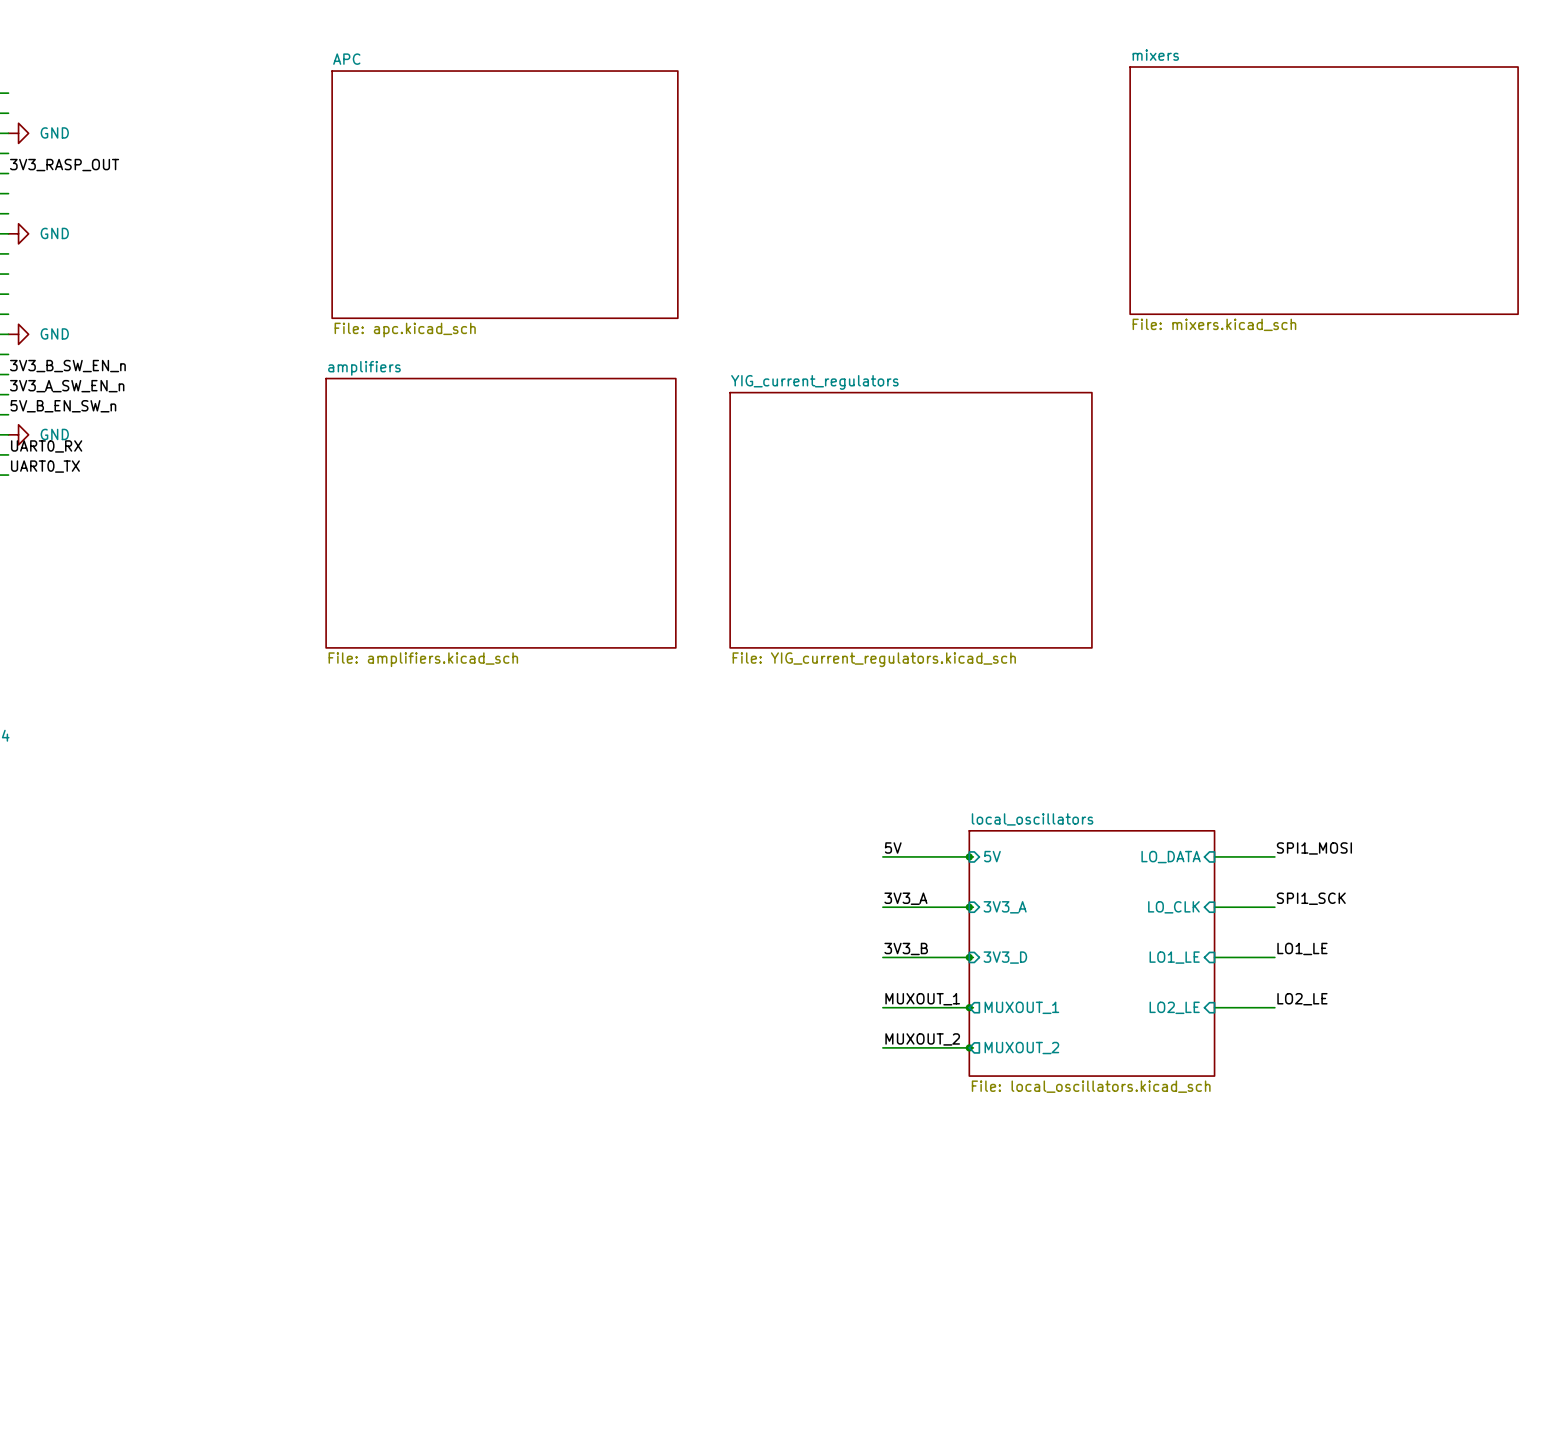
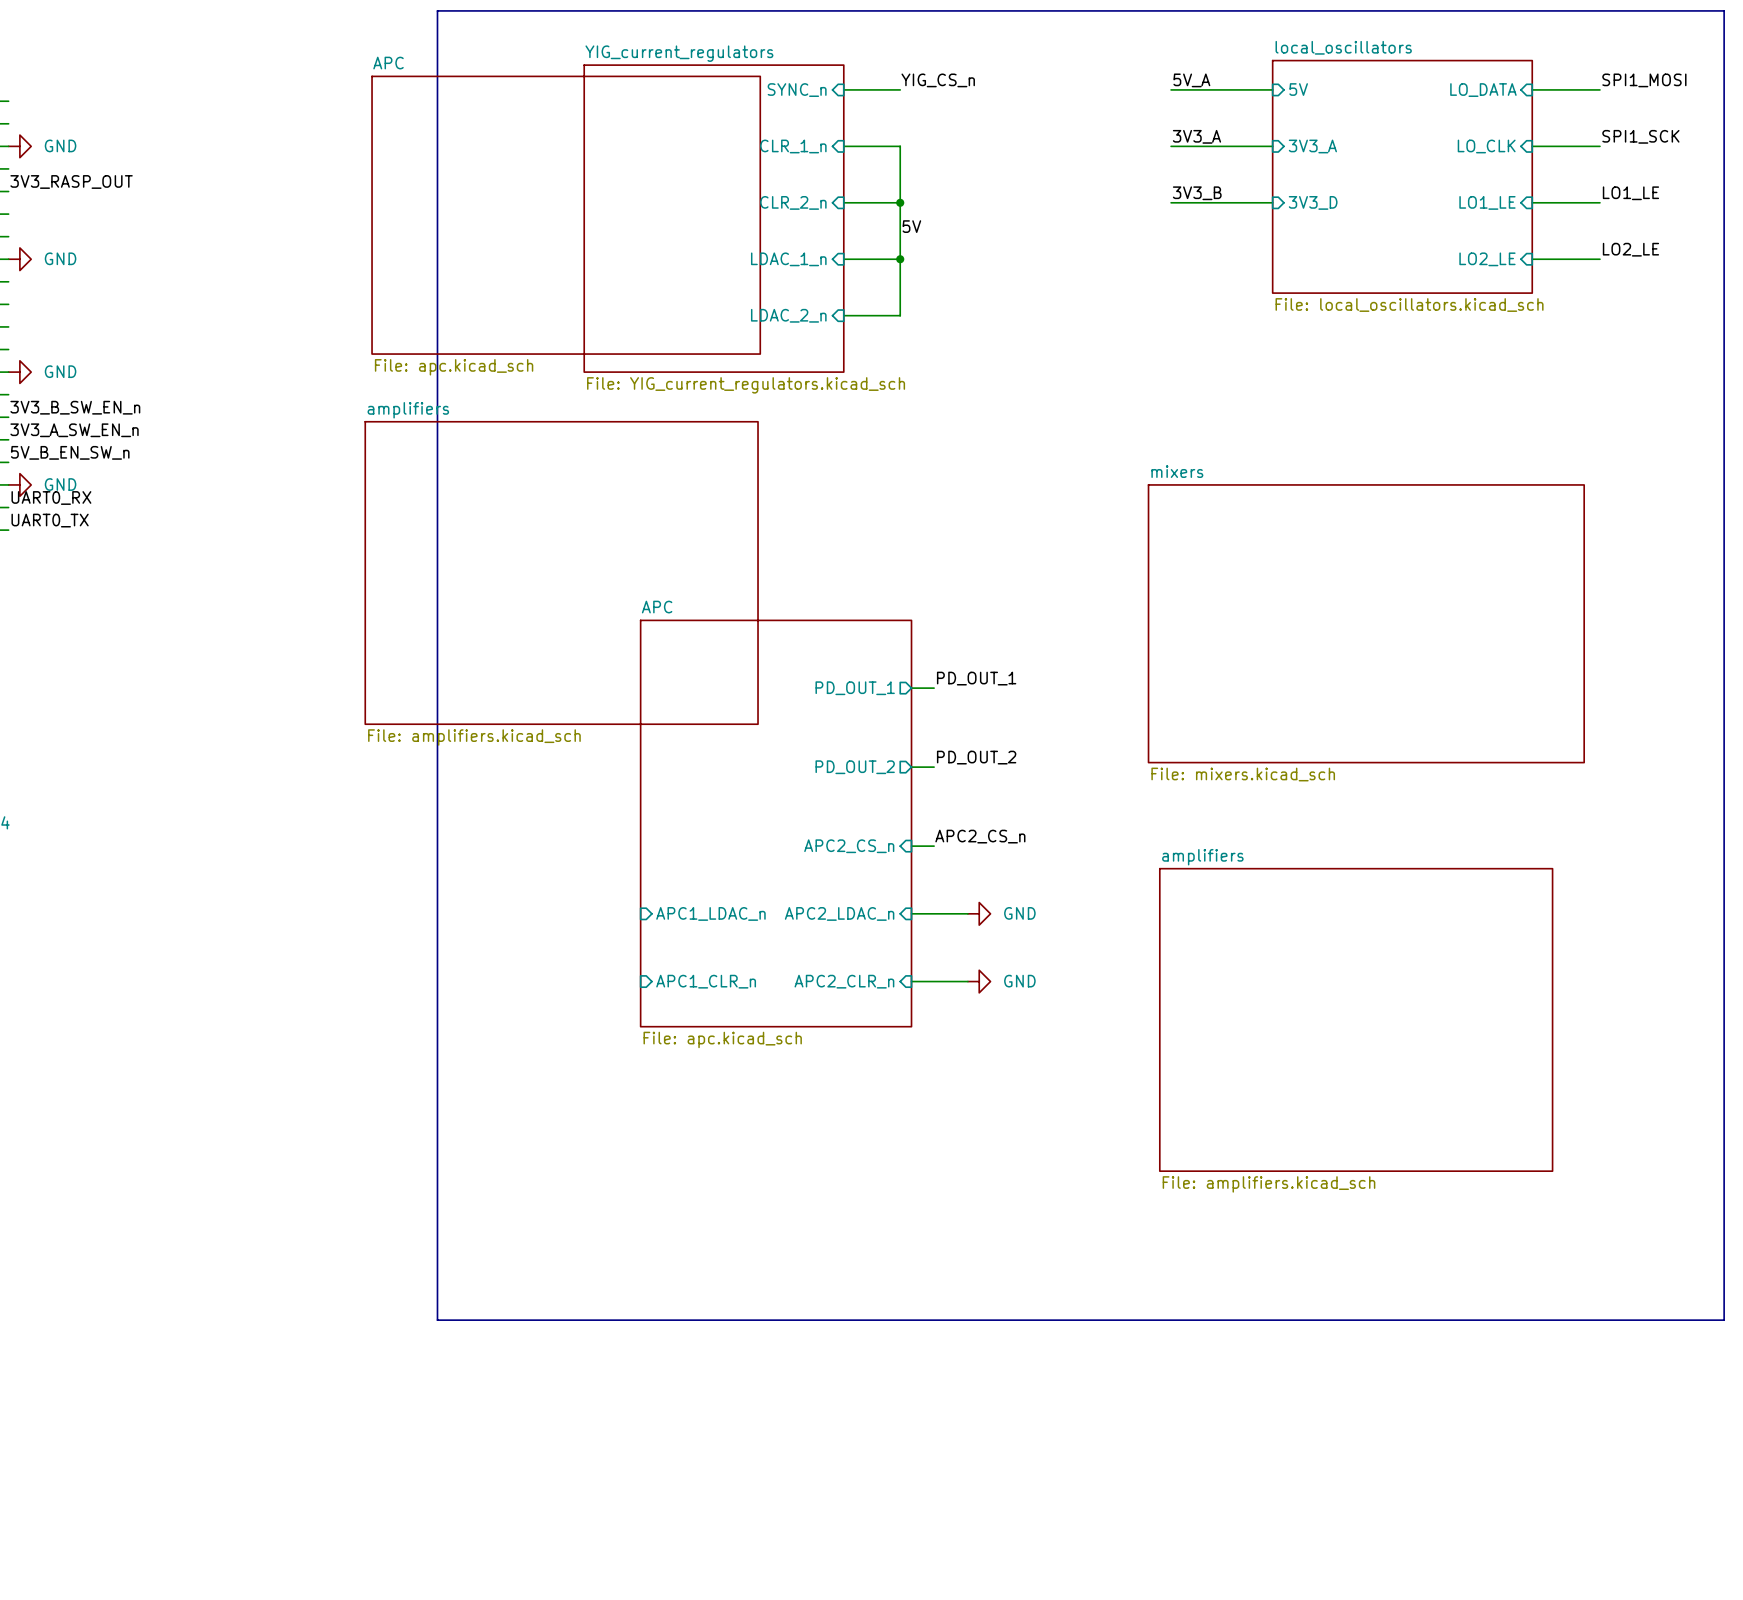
line: none -> (437, 10) (1724, 10) (1724, 1320) (437, 1320) (437, 10)
label: none -> YIG_CS_n (938, 80)
label: none -> 5V_A (1191, 80)
label: none -> SPI1_MOSI (1644, 80)
sheet pin: none -> 5V (1298, 89)
sheet pin: none -> SYNC_n (797, 90)
wire: none -> (843, 89) (900, 89)
wire: none -> (1171, 89) (1272, 89)
sheet pin: none -> LO_DATA (1483, 90)
wire: none -> (1532, 89) (1599, 89)
label: none -> 3V3_A (1196, 136)
label: none -> SPI1_SCK (1640, 136)
sheet pin: none -> CLR_1_n (793, 146)
wire: none -> (843, 146) (900, 146) (900, 315) (843, 315)
wire: none -> (1171, 146) (1272, 146)
sheet pin: none -> 3V3_A (1312, 146)
sheet pin: none -> LO_CLK (1486, 146)
wire: none -> (1532, 146) (1599, 146)
sheet local_oscillators: none -> File: local_oscillators.kicad_sch (1402, 176)
label: none -> 3V3_B (1197, 193)
label: none -> LO1_LE (1630, 193)
sheet pin: none -> CLR_2_n (793, 202)
wire: none -> (843, 202) (900, 202)
junction: none -> (900, 202)
wire: none -> (1171, 202) (1272, 202)
sheet pin: none -> 3V3_D (1313, 202)
sheet pin: none -> LO1_LE (1487, 202)
wire: none -> (1532, 202) (1599, 202)
sheet mixers: File: mixers.kicad_sch (1324, 190) -> none
sheet YIG_current_regulators: none -> File: YIG_current_regulators.kicad_sch (714, 218)
label: none -> 5V (911, 226)
label: none -> LO2_LE (1630, 249)
sheet pin: none -> LDAC_1_n (788, 259)
wire: none -> (843, 259) (900, 259)
junction: none -> (900, 259)
sheet pin: none -> LO2_LE (1487, 259)
wire: none -> (1532, 259) (1599, 259)
sheet pin: none -> LDAC_2_n (788, 315)
sheet YIG_current_regulators: File: YIG_current_regulators.kicad_sch (911, 520) -> none
sheet mixers: none -> File: mixers.kicad_sch (1366, 623)
label: none -> PD_OUT_1 (976, 678)
sheet pin: none -> PD_OUT_1 (855, 688)
wire: none -> (911, 688) (934, 688)
label: none -> PD_OUT_2 (976, 757)
sheet pin: none -> PD_OUT_2 (855, 767)
wire: none -> (911, 767) (934, 767)
sheet APC: none -> File: apc.kicad_sch (776, 823)
label: none -> APC2_CS_n (980, 836)
sheet pin: none -> APC2_CS_n (849, 846)
wire: none -> (911, 846) (934, 846)
sheet pin: none -> APC1_LDAC_n (710, 913)
sheet pin: none -> APC2_LDAC_n (839, 913)
wire: none -> (911, 913) (967, 913)
power symbol: none -> GND (979, 913)
label: 5V (893, 847) -> none
label: SPI1_MOSI (1314, 848) -> none
wire: (882, 856) (973, 856) -> none
junction: (969, 856) -> none
sheet pin: 5V (992, 856) -> none
wire: (1214, 856) (1274, 856) -> none
sheet pin: LO_DATA (1171, 857) -> none
sheet pin: none -> APC1_CLR_n (706, 981)
sheet pin: none -> APC2_CLR_n (844, 981)
wire: none -> (911, 981) (967, 981)
power symbol: none -> GND (979, 981)
label: 3V3_A (905, 898) -> none
label: SPI1_SCK (1311, 898) -> none
wire: (882, 907) (973, 907) -> none
junction: (969, 907) -> none
sheet pin: 3V3_A (1005, 907) -> none
sheet pin: LO_CLK (1173, 907) -> none
wire: (1214, 907) (1274, 907) -> none
sheet amplifiers: none -> File: amplifiers.kicad_sch (1356, 1019)
label: 3V3_B (906, 948) -> none
label: LO1_LE (1302, 948) -> none
sheet local_oscillators: File: local_oscillators.kicad_sch (1091, 953) -> none
wire: (882, 957) (973, 957) -> none
junction: (969, 957) -> none
sheet pin: 3V3_D (1005, 957) -> none
sheet pin: LO1_LE (1174, 957) -> none
wire: (1214, 957) (1274, 957) -> none
label: MUXOUT_1 (922, 999) -> none
label: LO2_LE (1302, 999) -> none
wire: (882, 1007) (973, 1007) -> none
junction: (969, 1007) -> none
sheet pin: MUXOUT_1 (1021, 1007) -> none
sheet pin: LO2_LE (1174, 1007) -> none
wire: (1214, 1007) (1274, 1007) -> none
label: MUXOUT_2 (922, 1039) -> none
wire: (882, 1047) (973, 1047) -> none
junction: (969, 1047) -> none
sheet pin: MUXOUT_2 (1021, 1048) -> none

